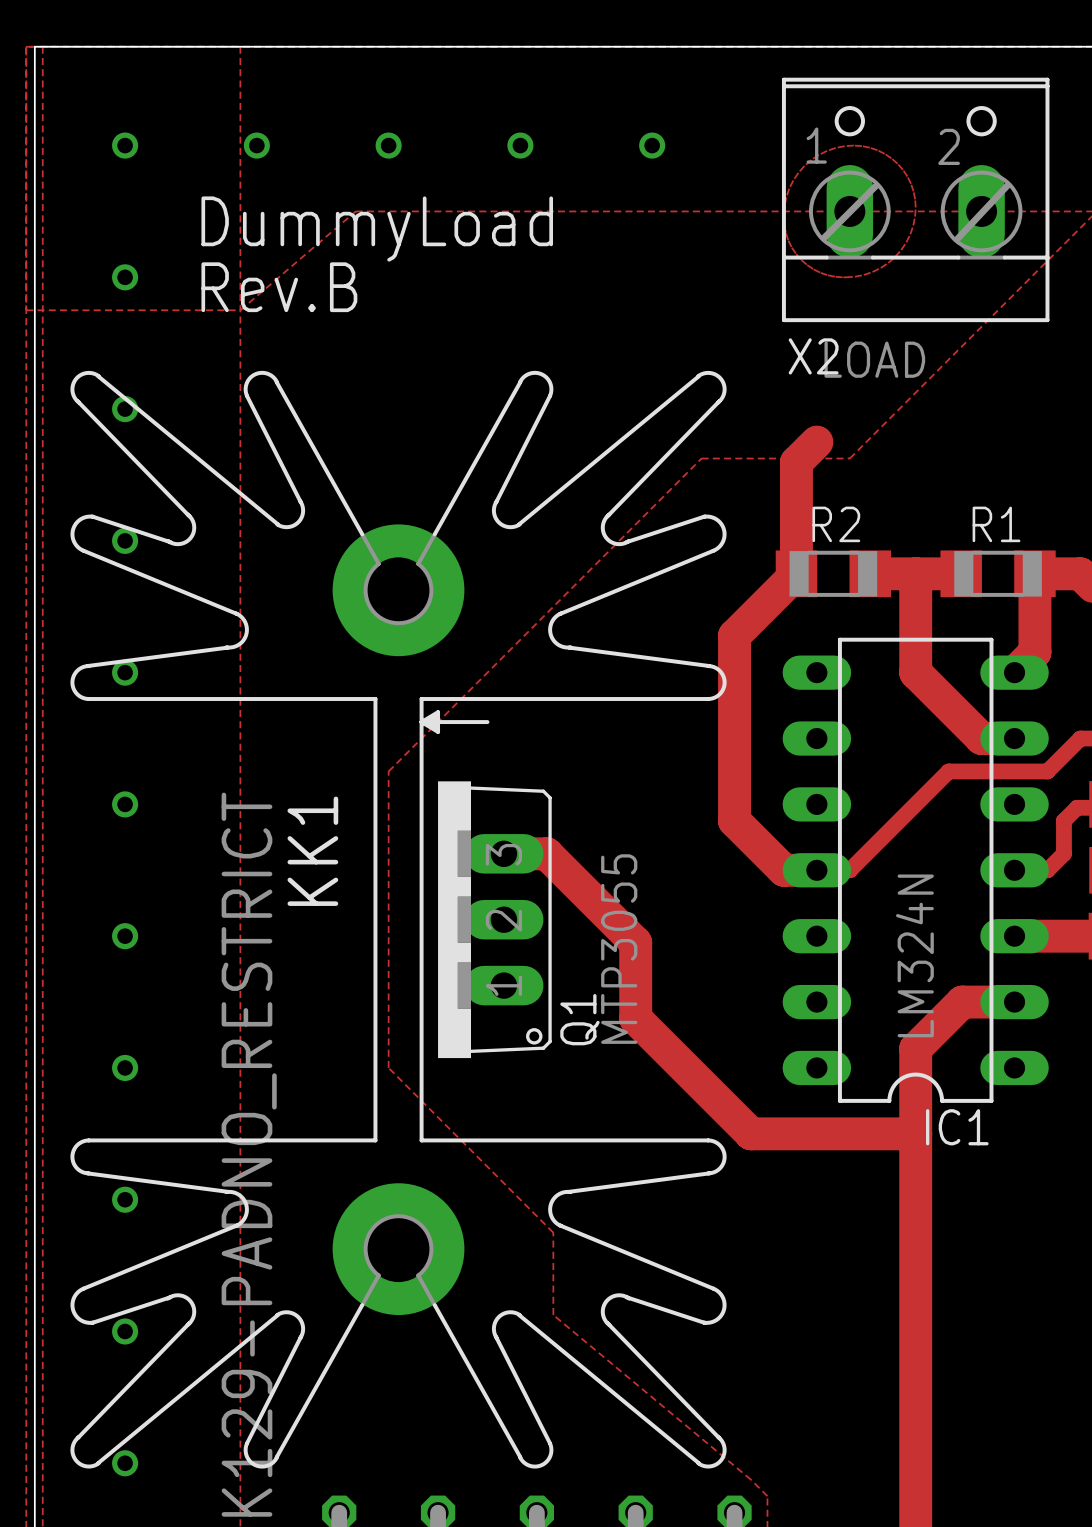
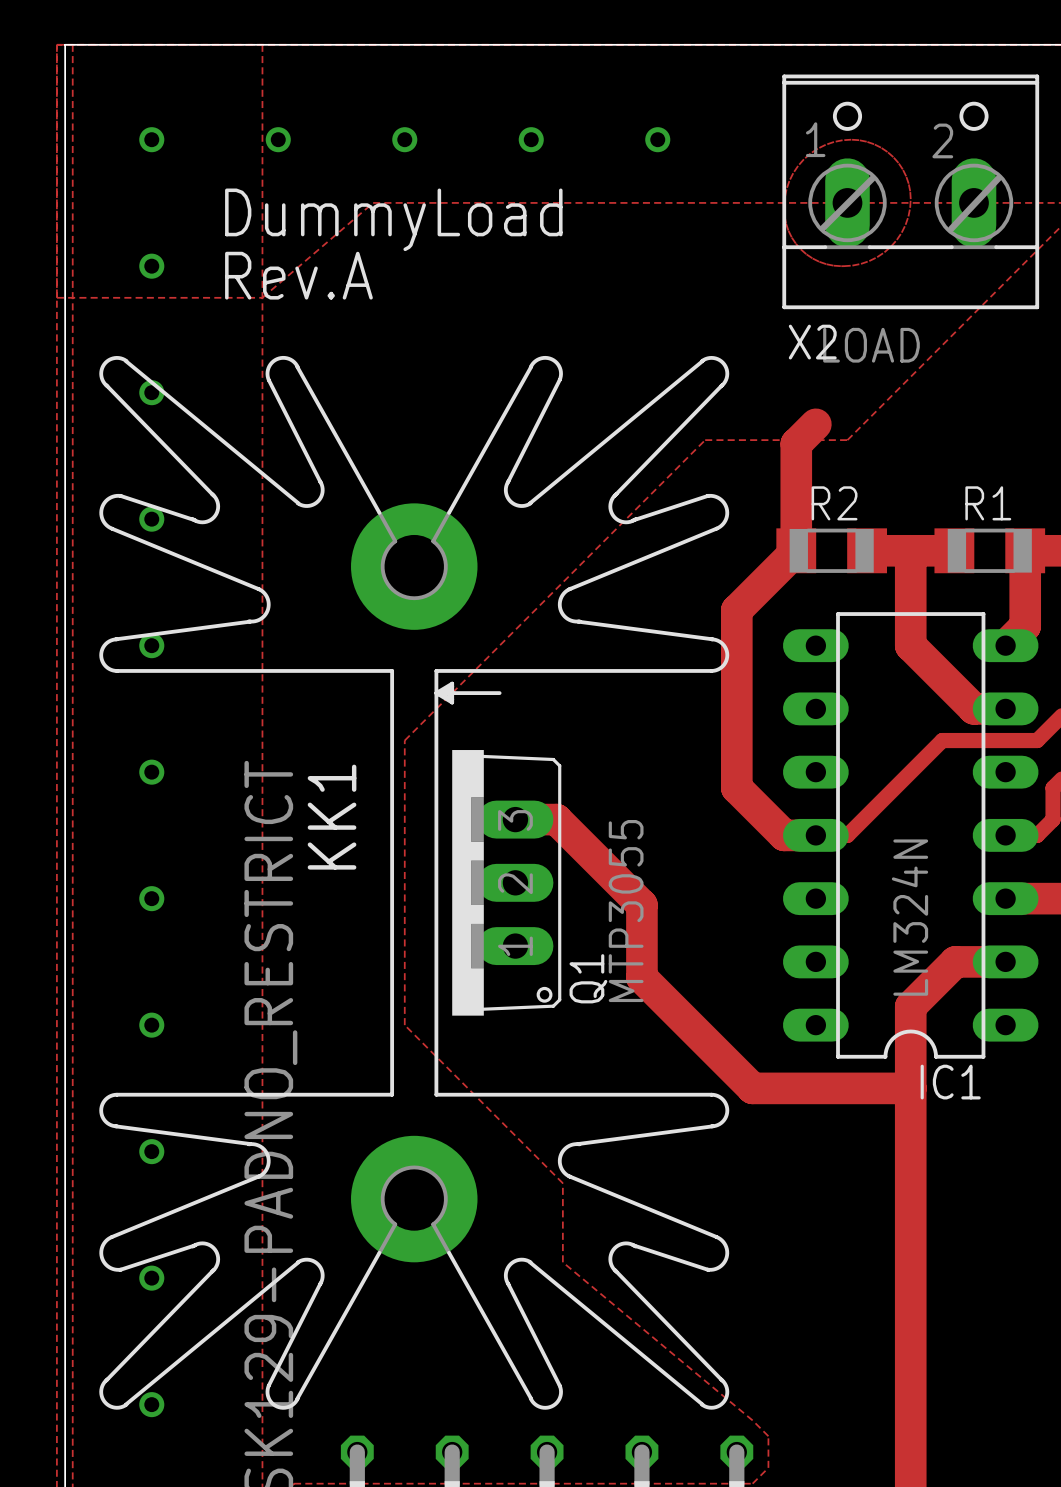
text: Rev.B (279, 287) -> Rev.A (298, 275)

